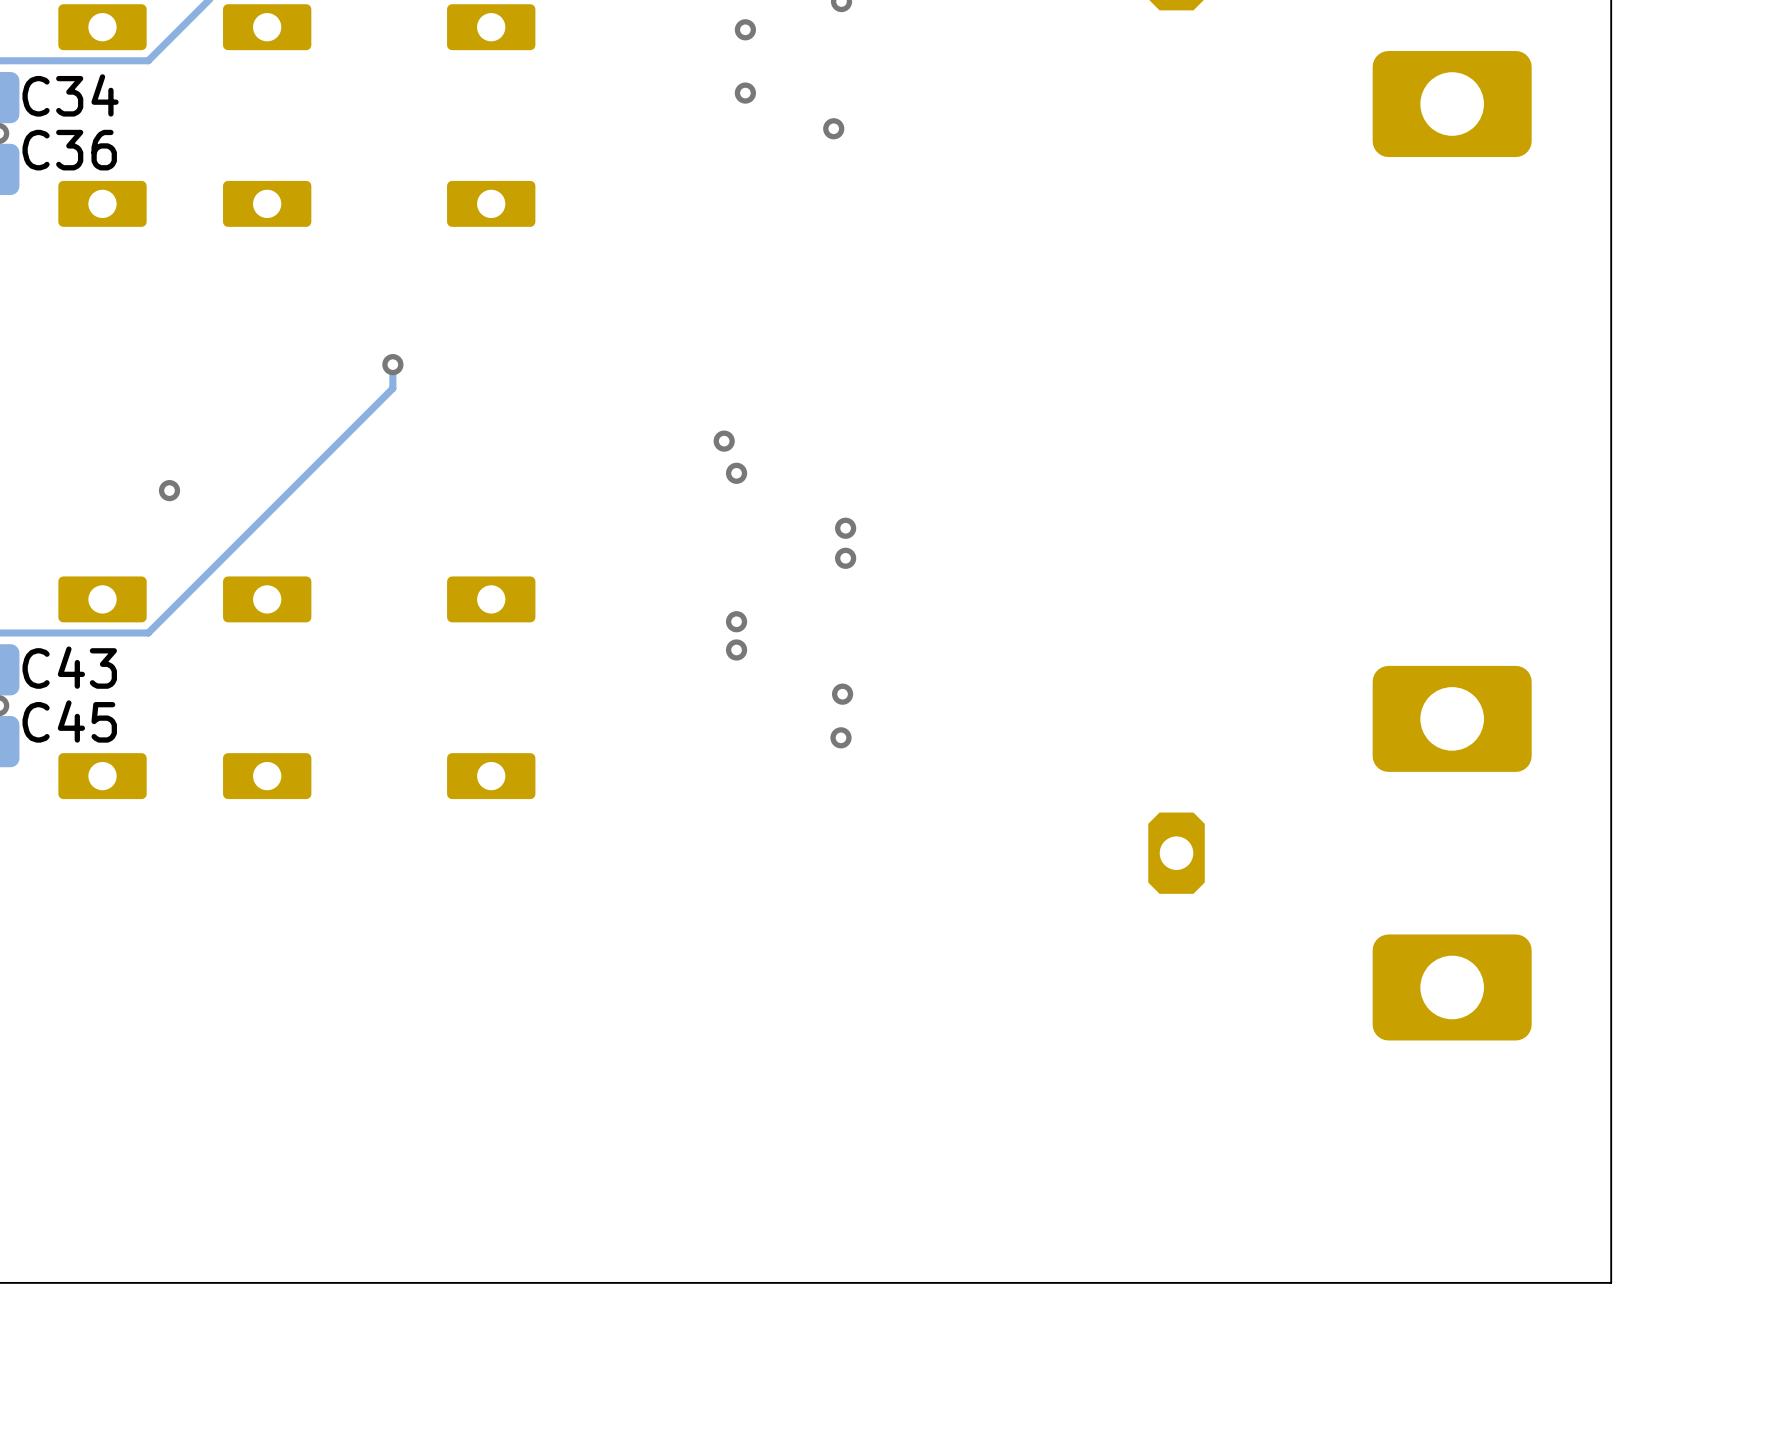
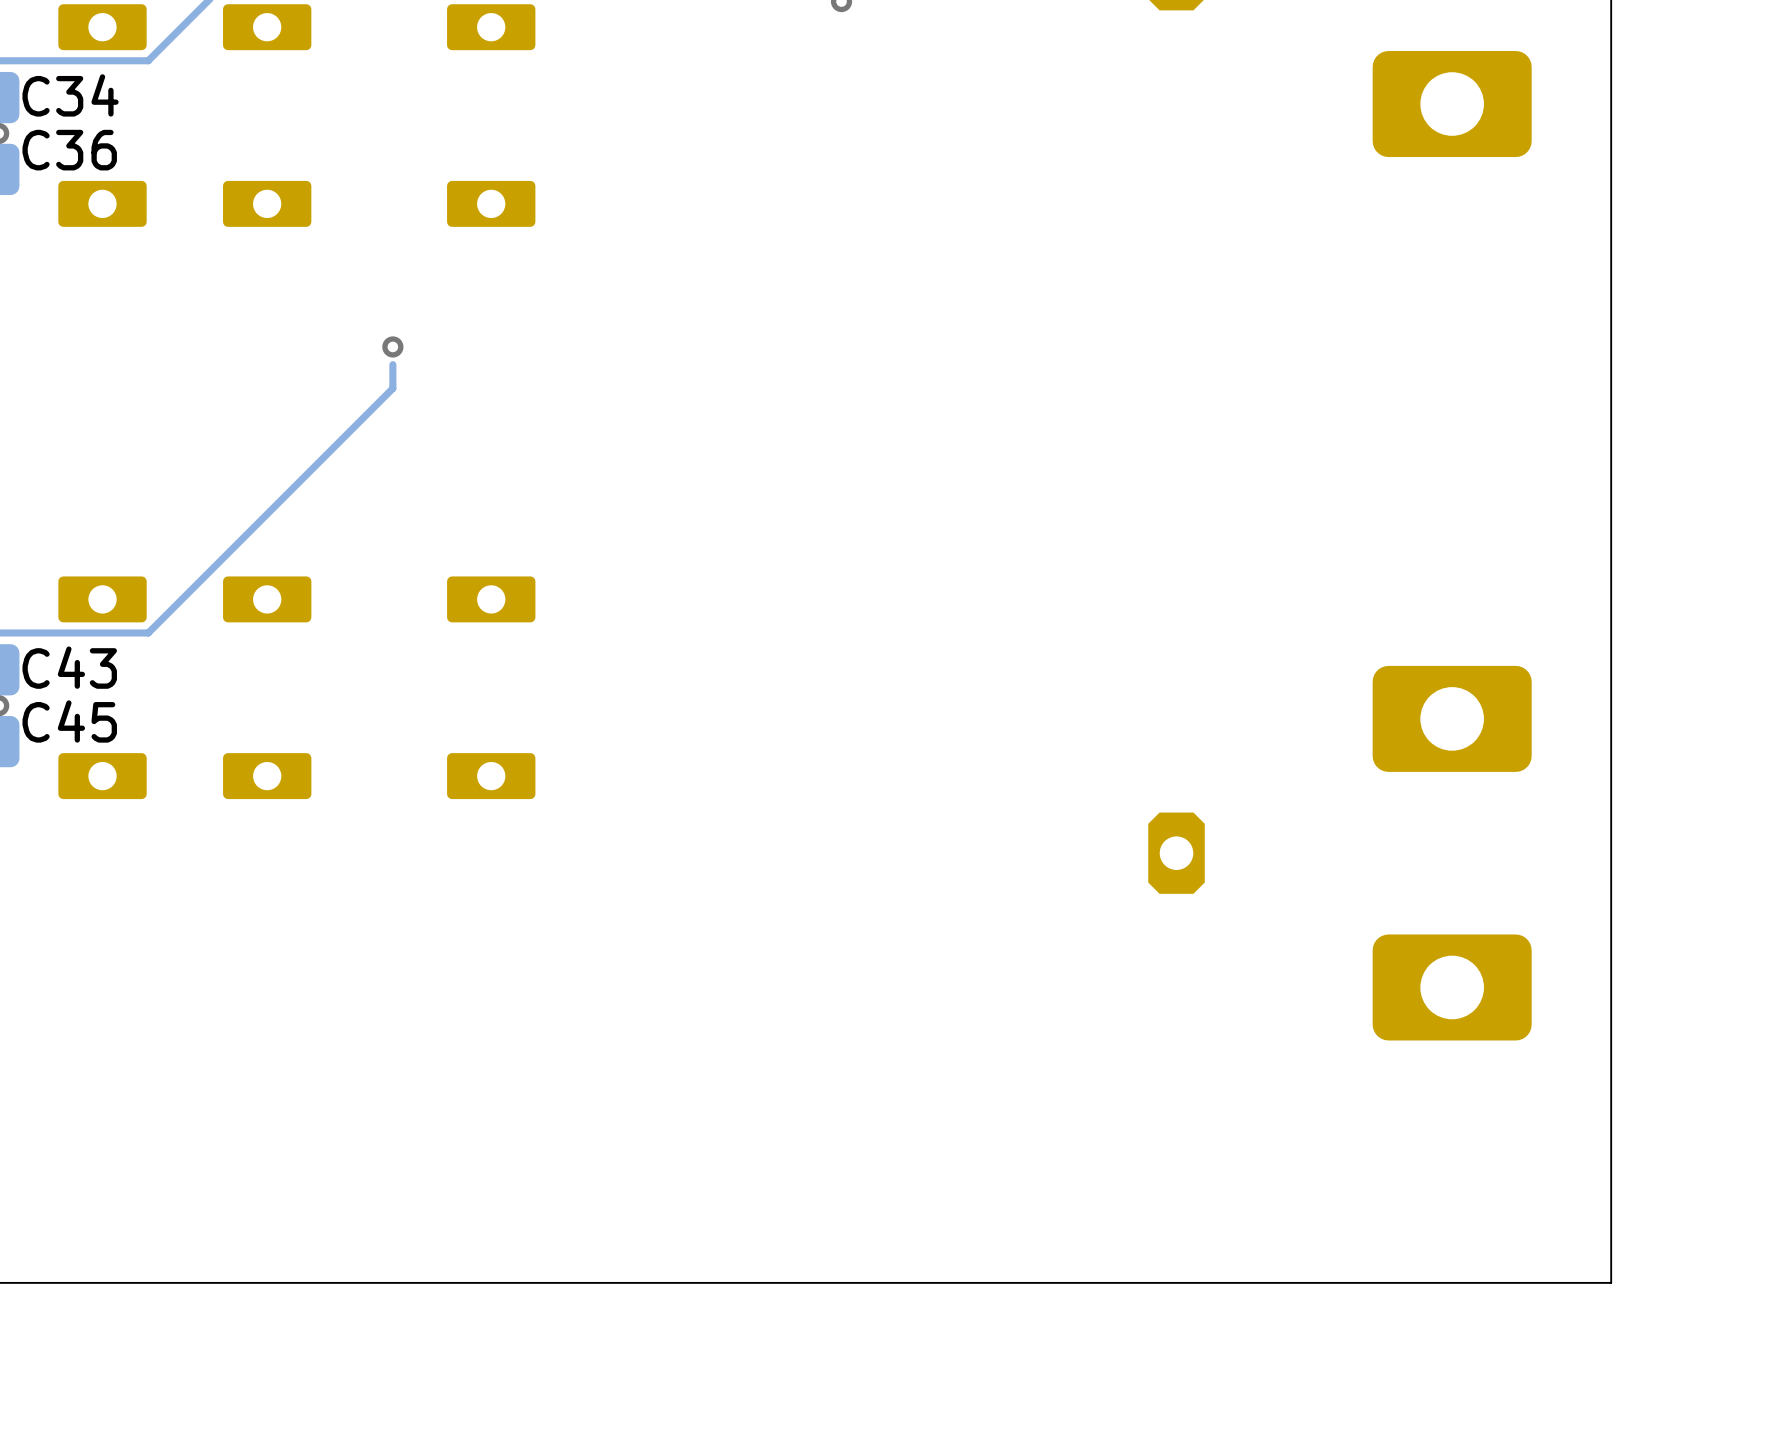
via: (745, 29) -> none
via: (745, 93) -> none
via: (833, 128) -> none
via position: (392, 364) -> (392, 346)
via: (724, 441) -> none
via: (736, 473) -> none
via: (169, 490) -> none
via: (845, 528) -> none
via: (845, 558) -> none
via: (736, 621) -> none
via: (736, 649) -> none
via: (842, 694) -> none
via: (841, 737) -> none

